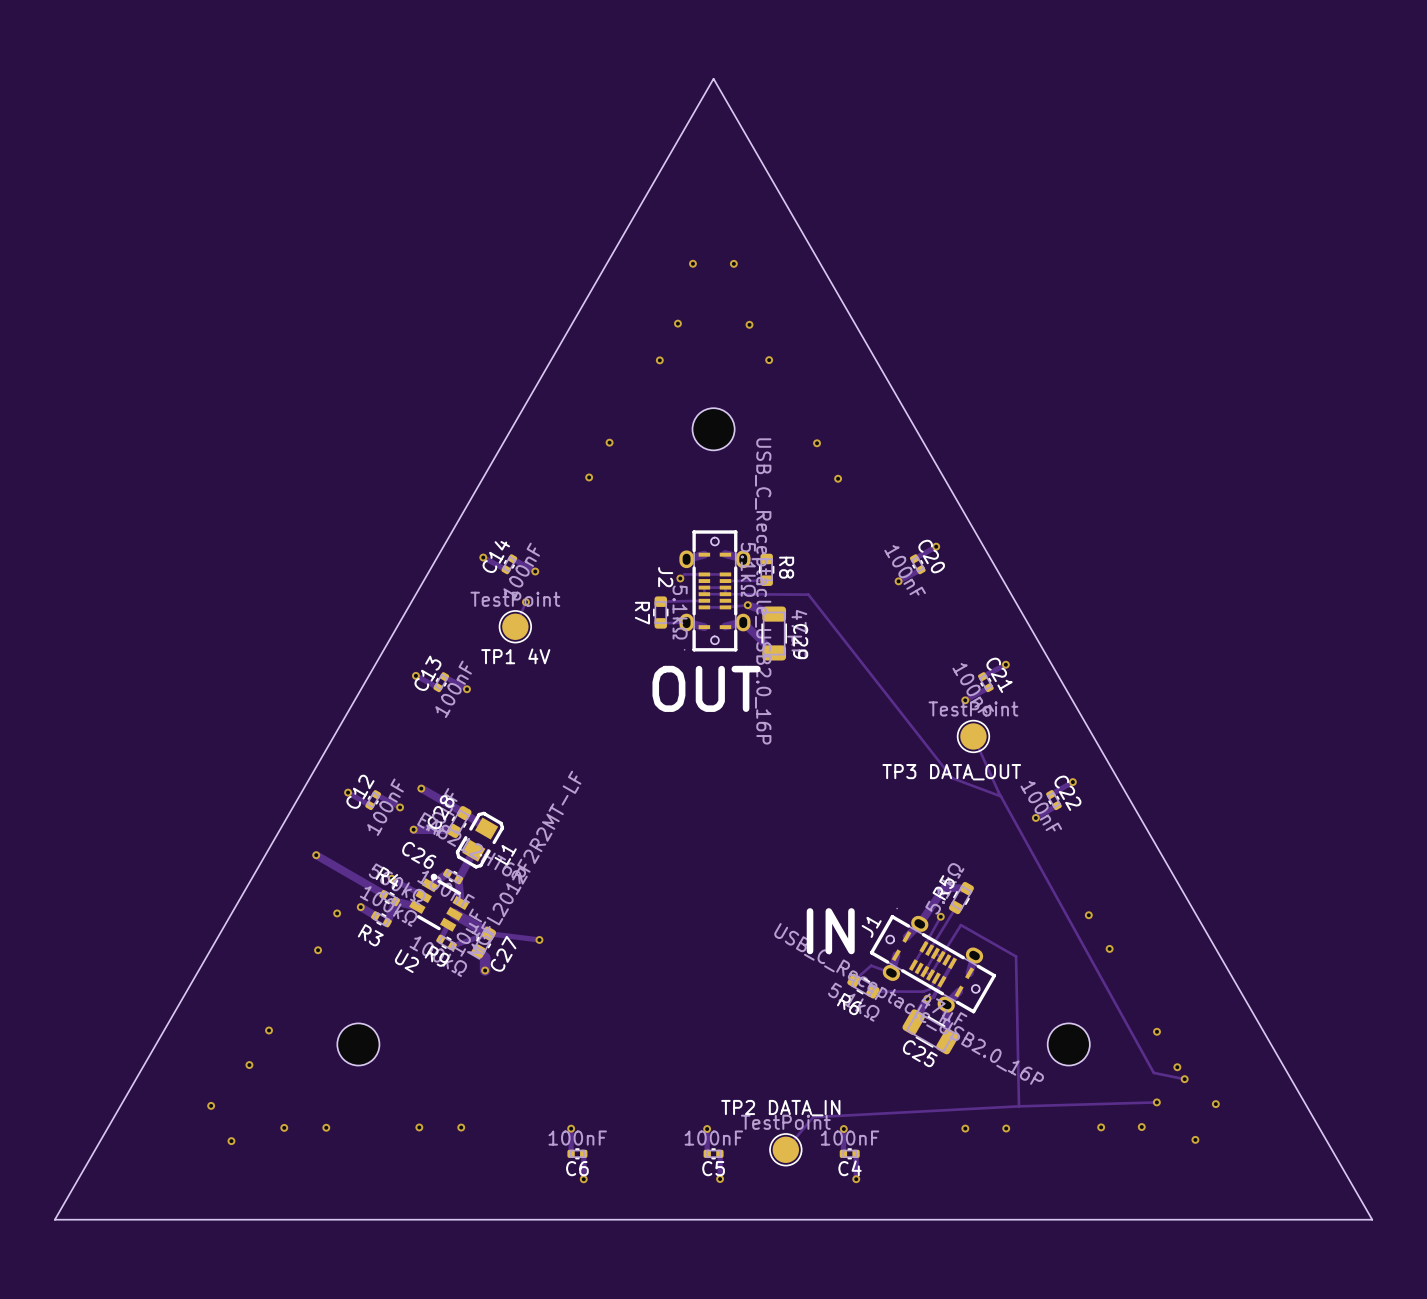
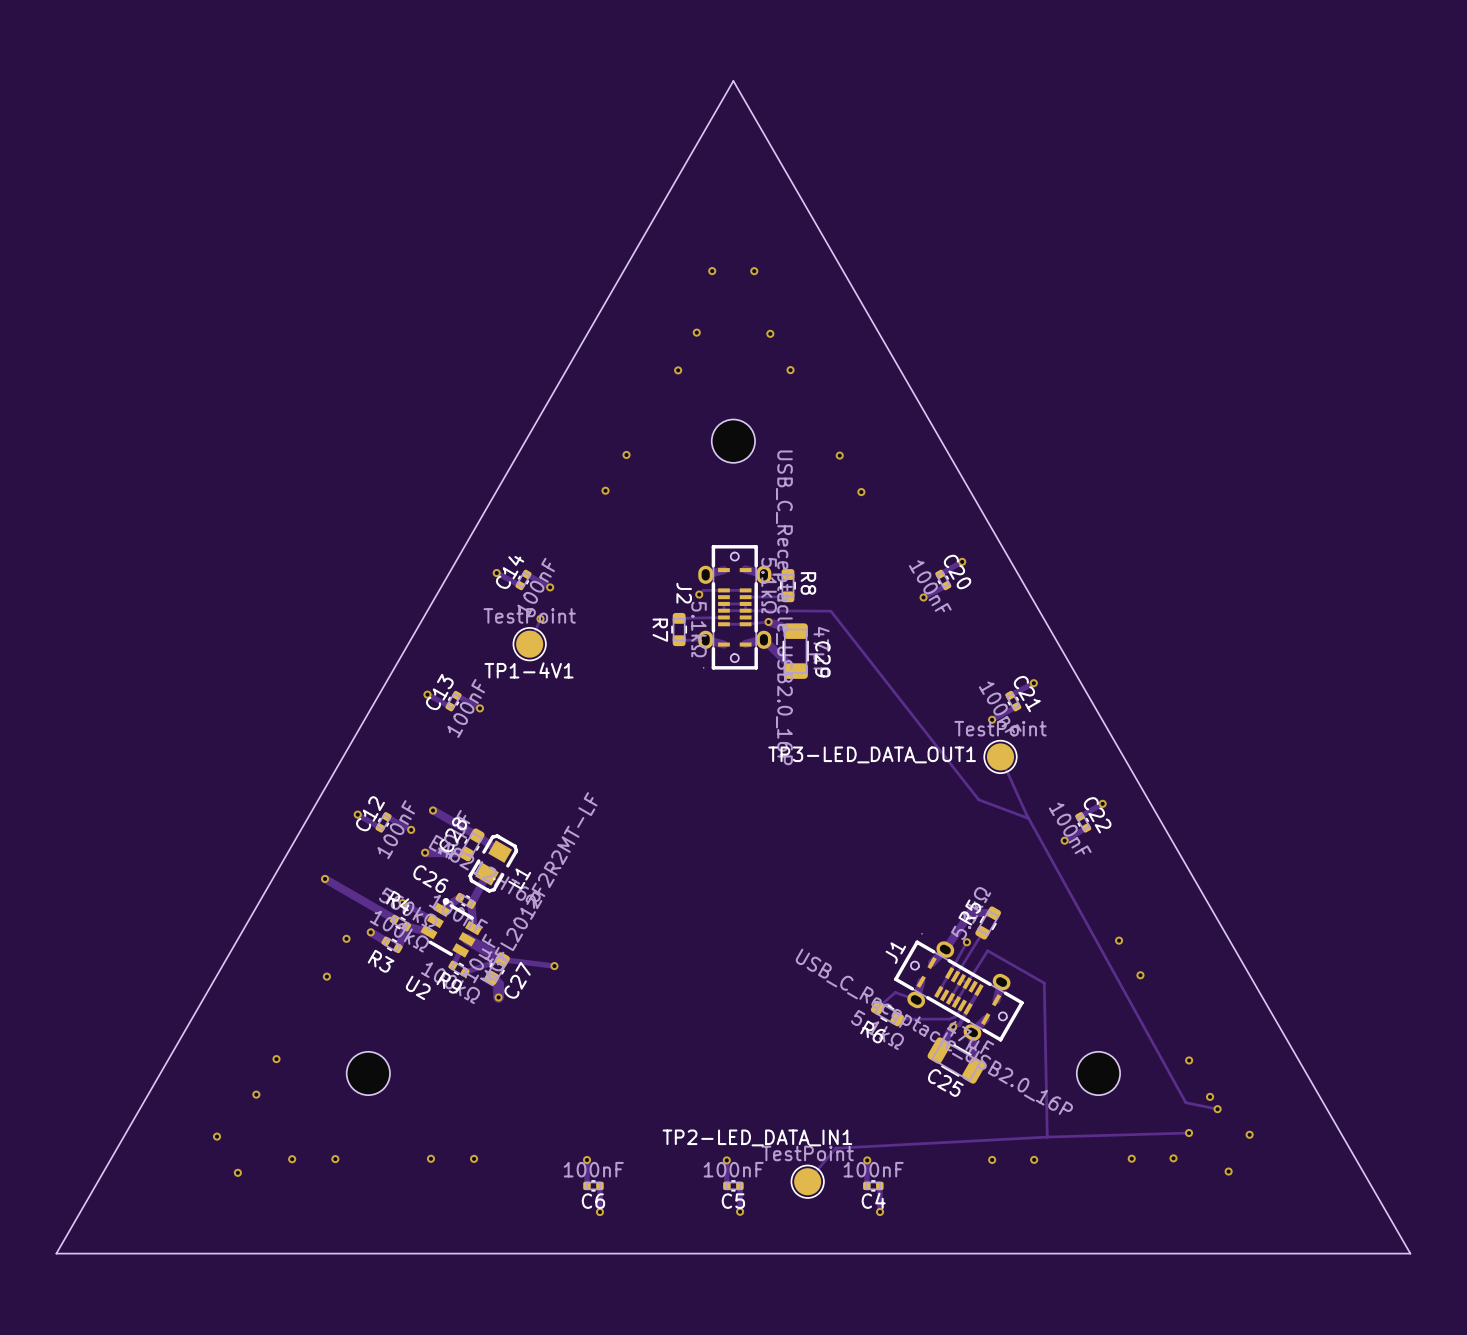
TP1 4V name: TP1 4V (515, 656) -> TP1-4V1 (529, 670)
text: OUT (706, 688) -> none
TP3 DATA_OUT name: TP3 DATA_OUT (951, 772) -> TP3-LED_DATA_OUT1 (872, 754)
text: IN (830, 931) -> none
TP2 DATA_IN name: TP2 DATA_IN (780, 1108) -> TP2-LED_DATA_IN1 (757, 1137)

